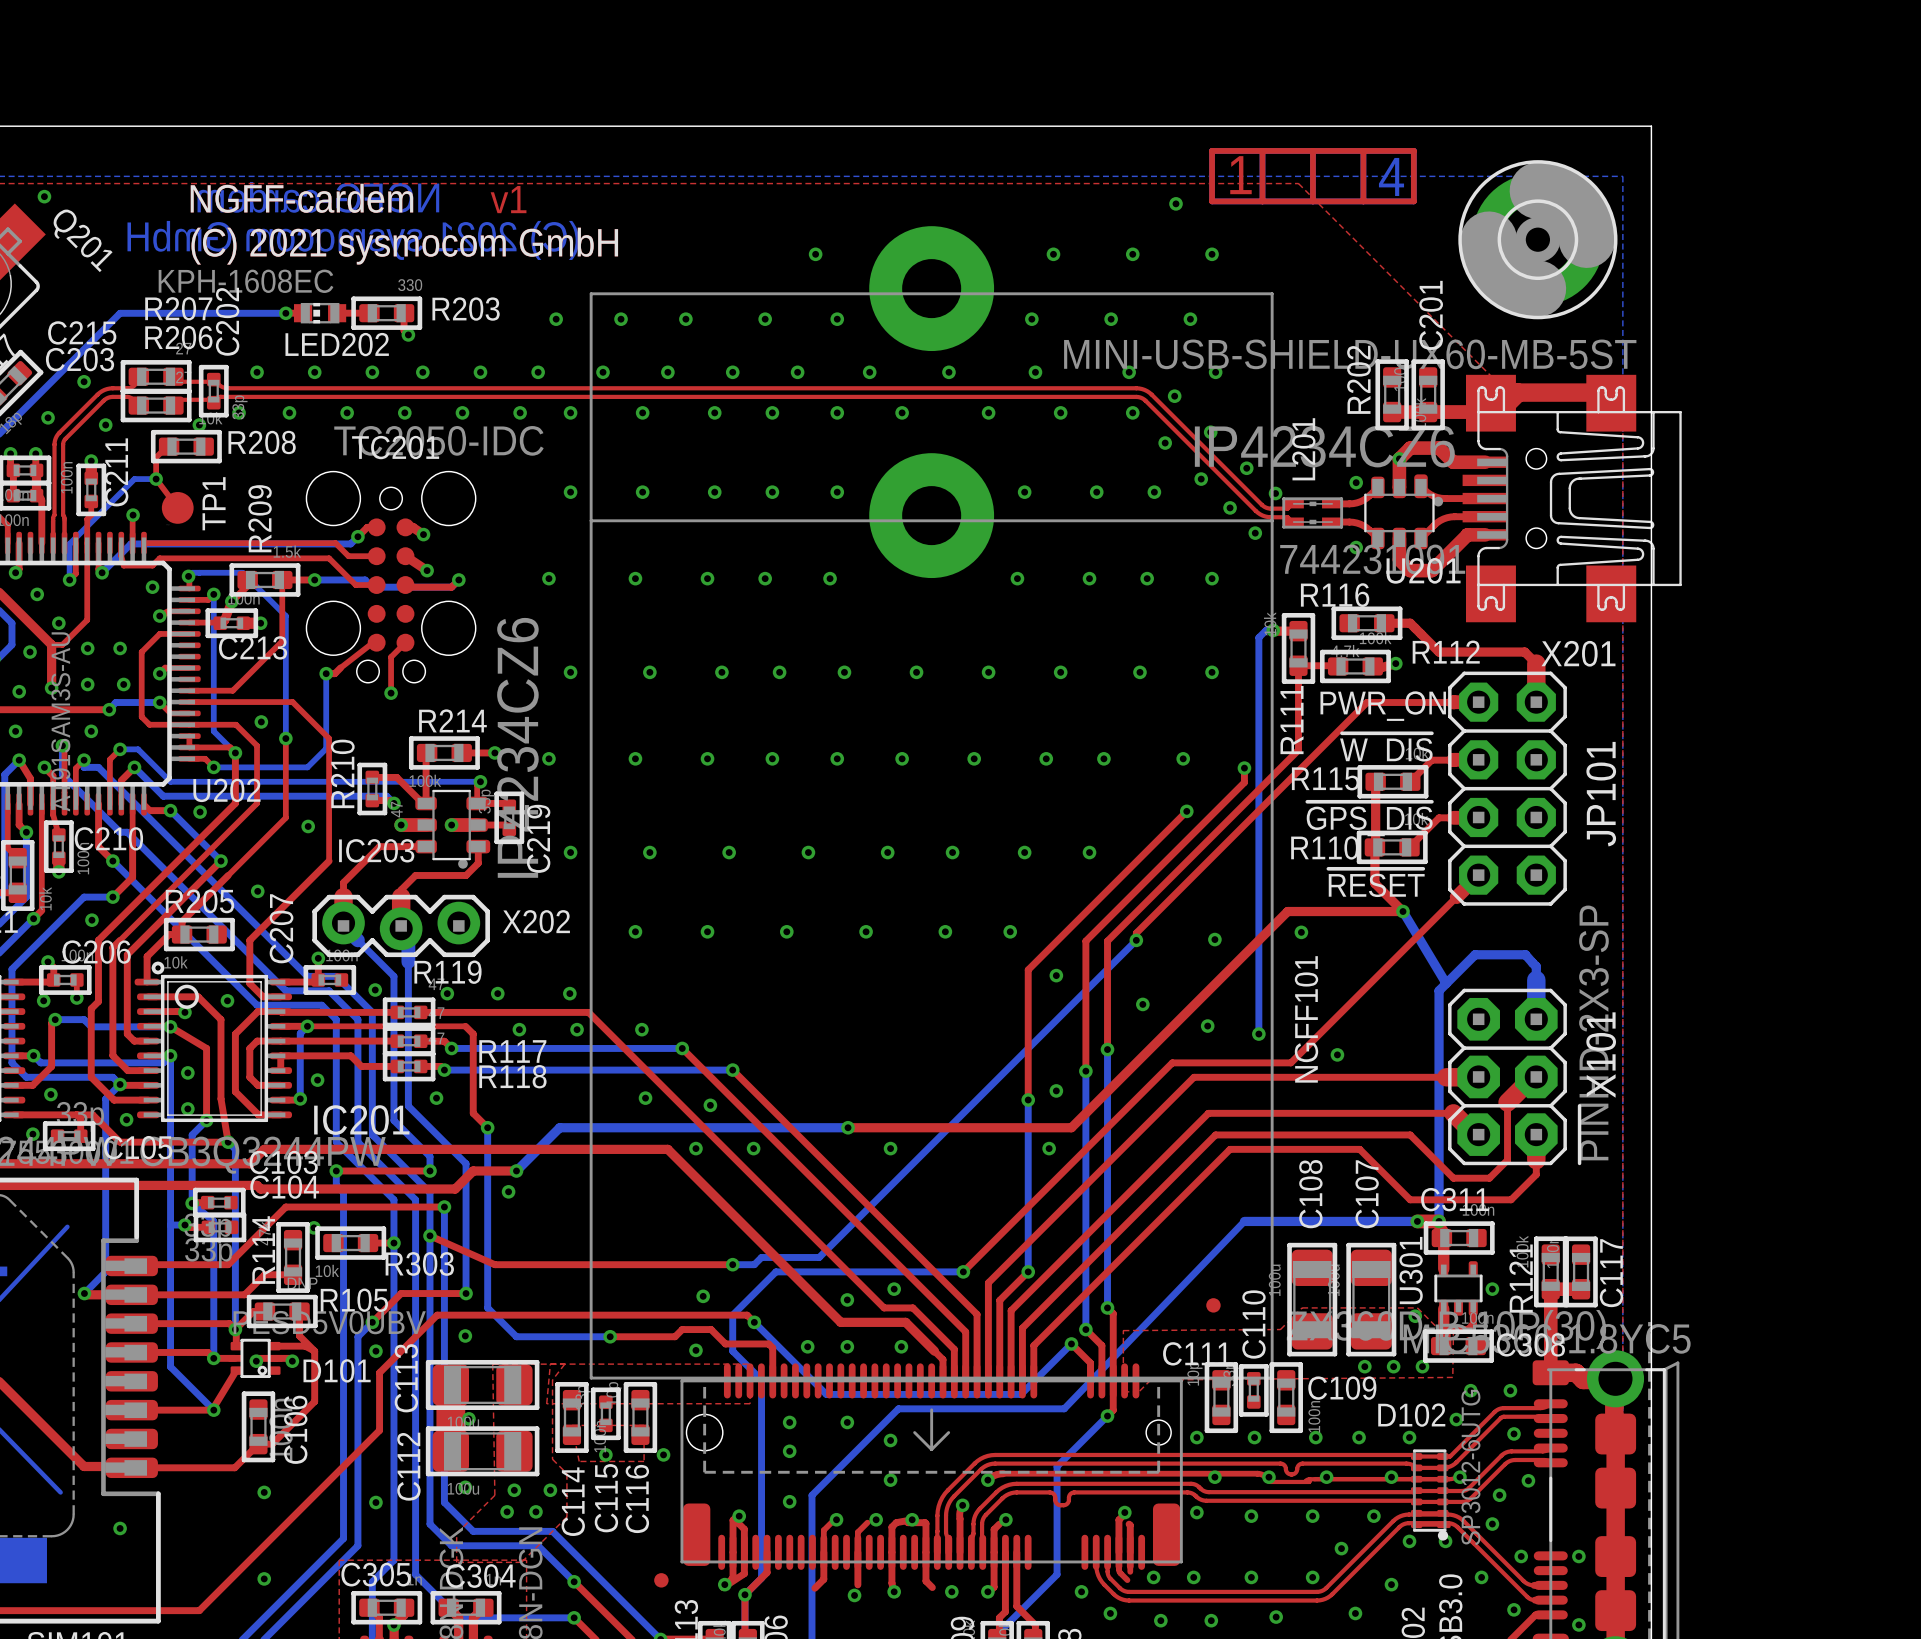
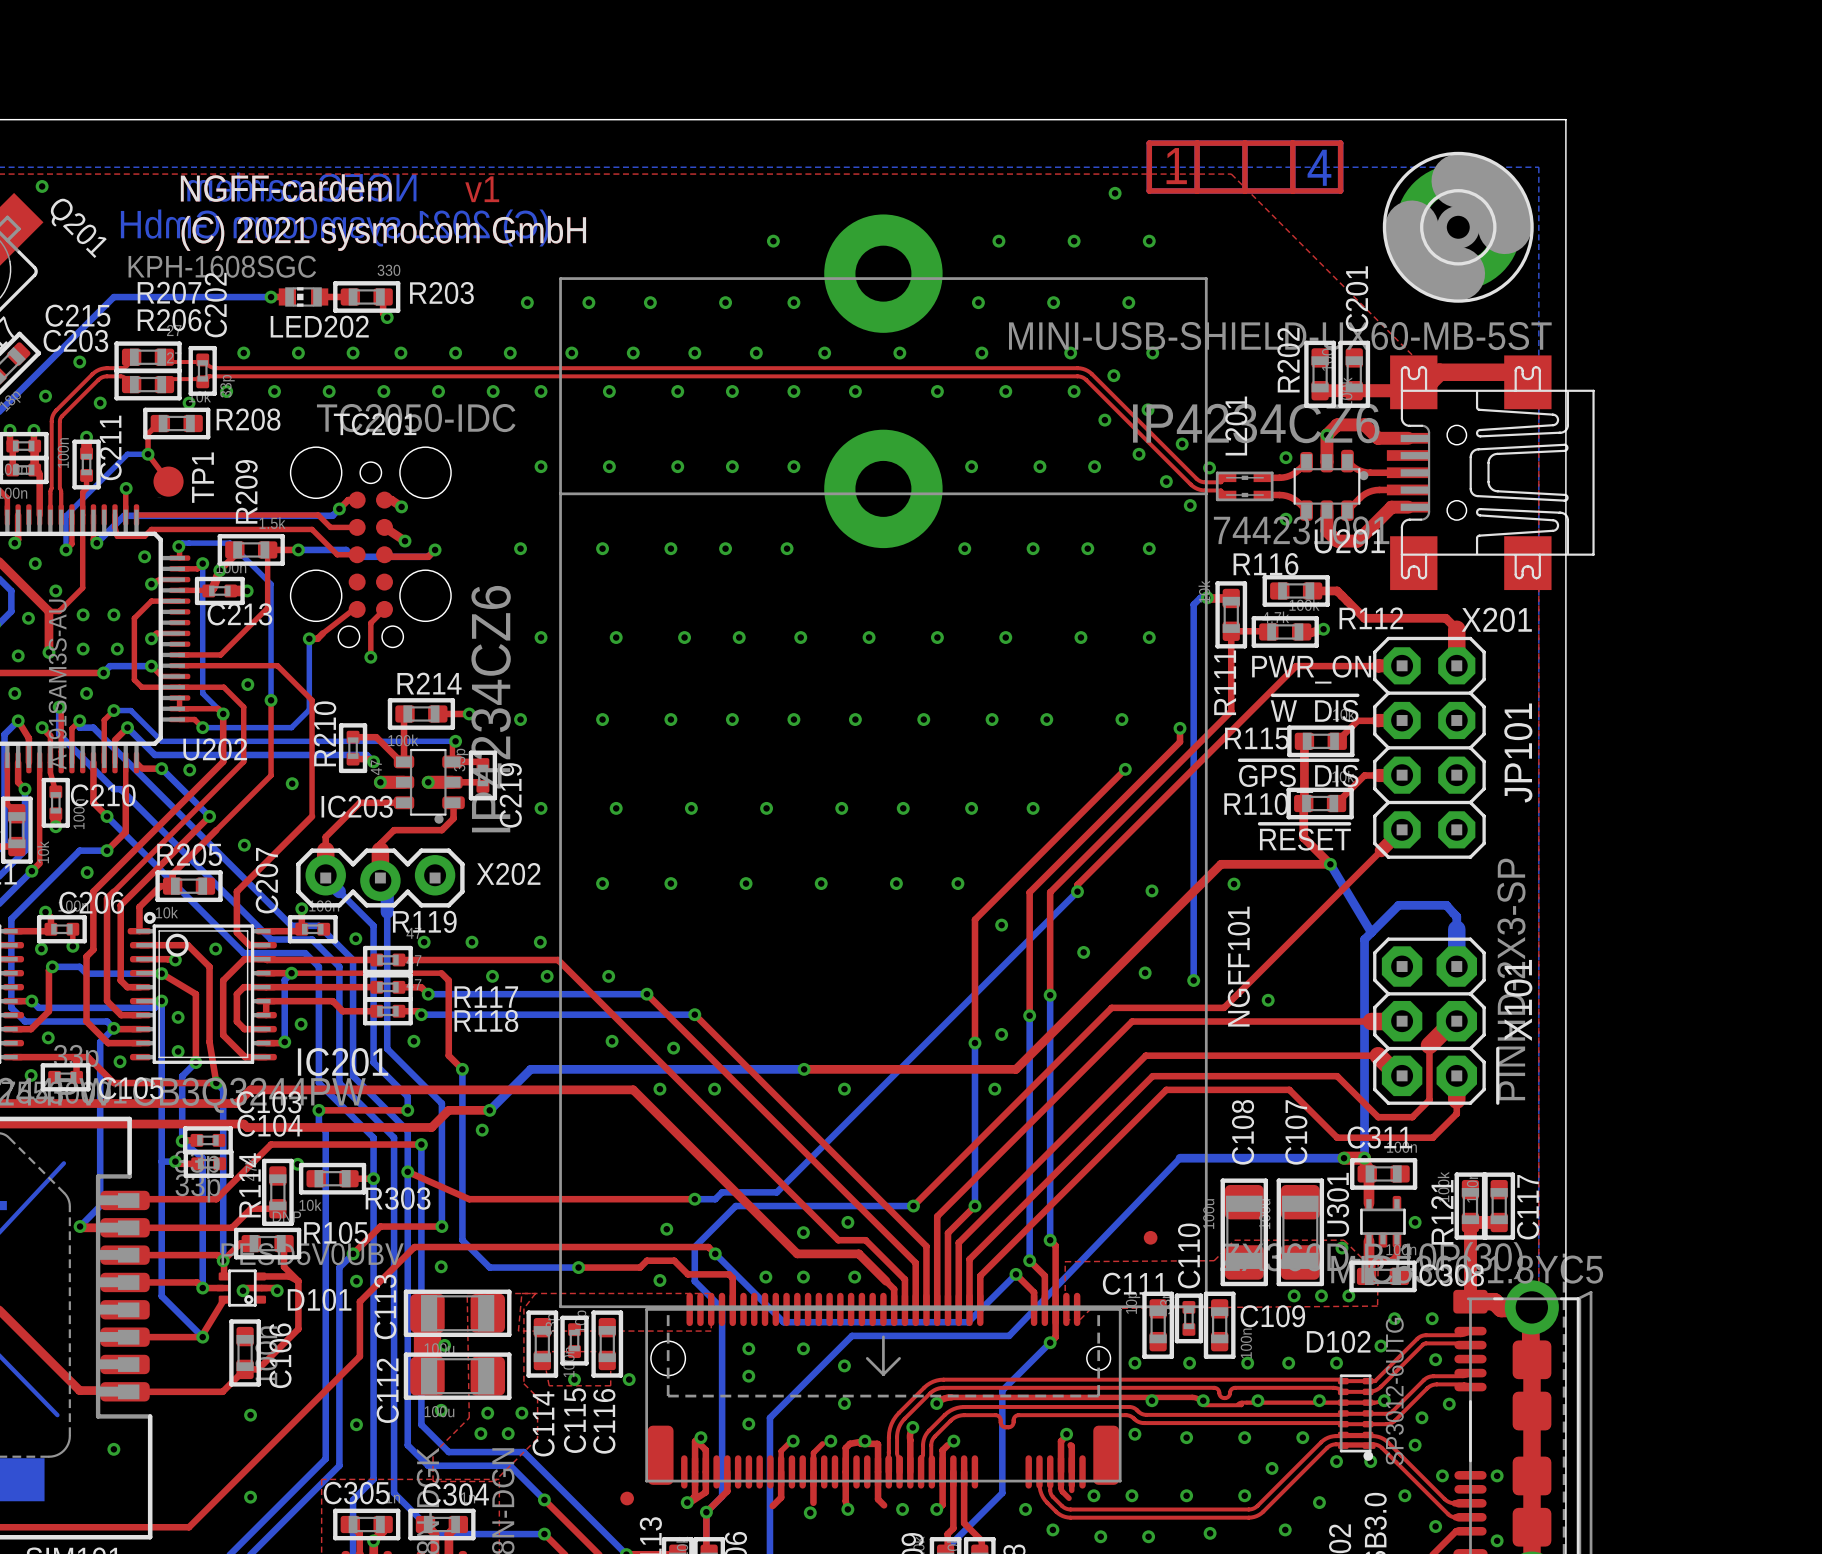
LED202 value: KPH-1608EC (246, 281) -> KPH-1608SGC (222, 266)

